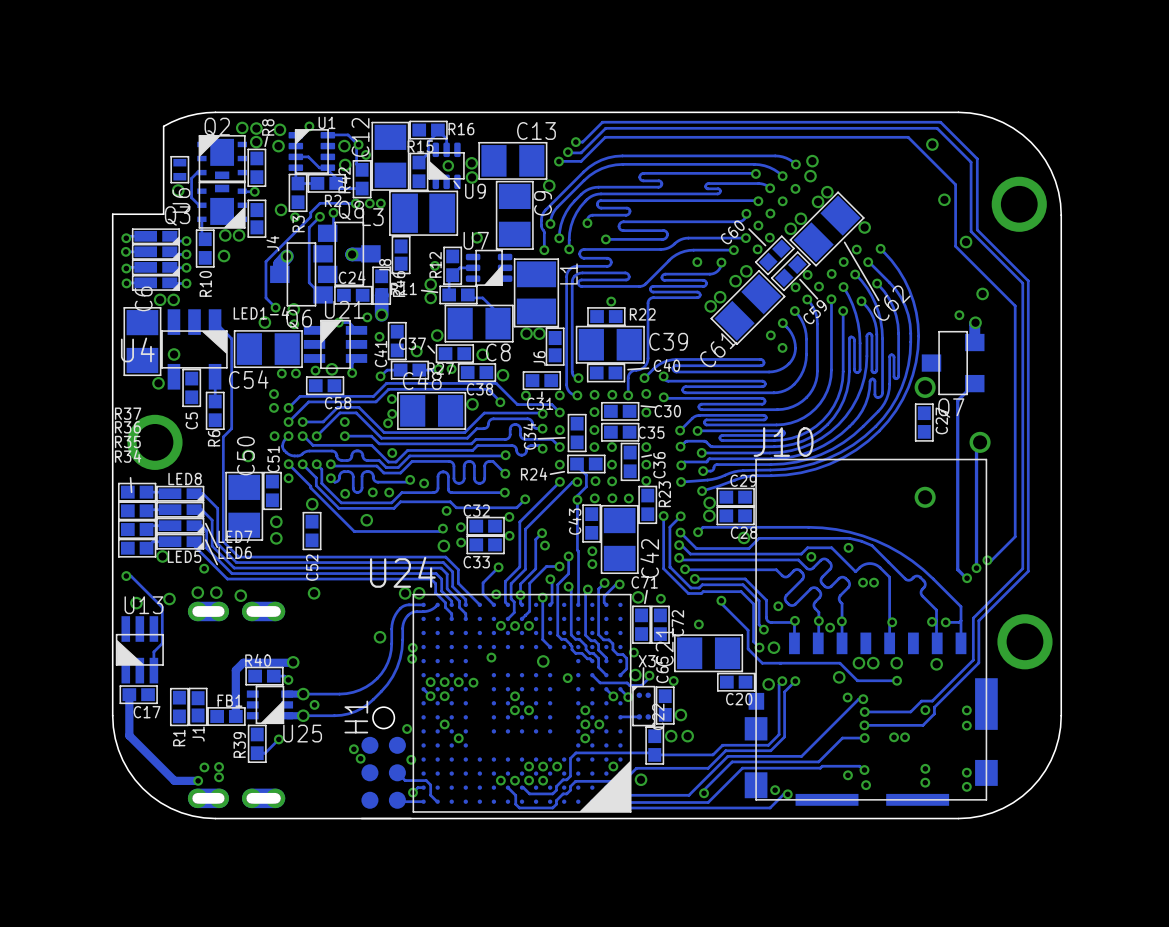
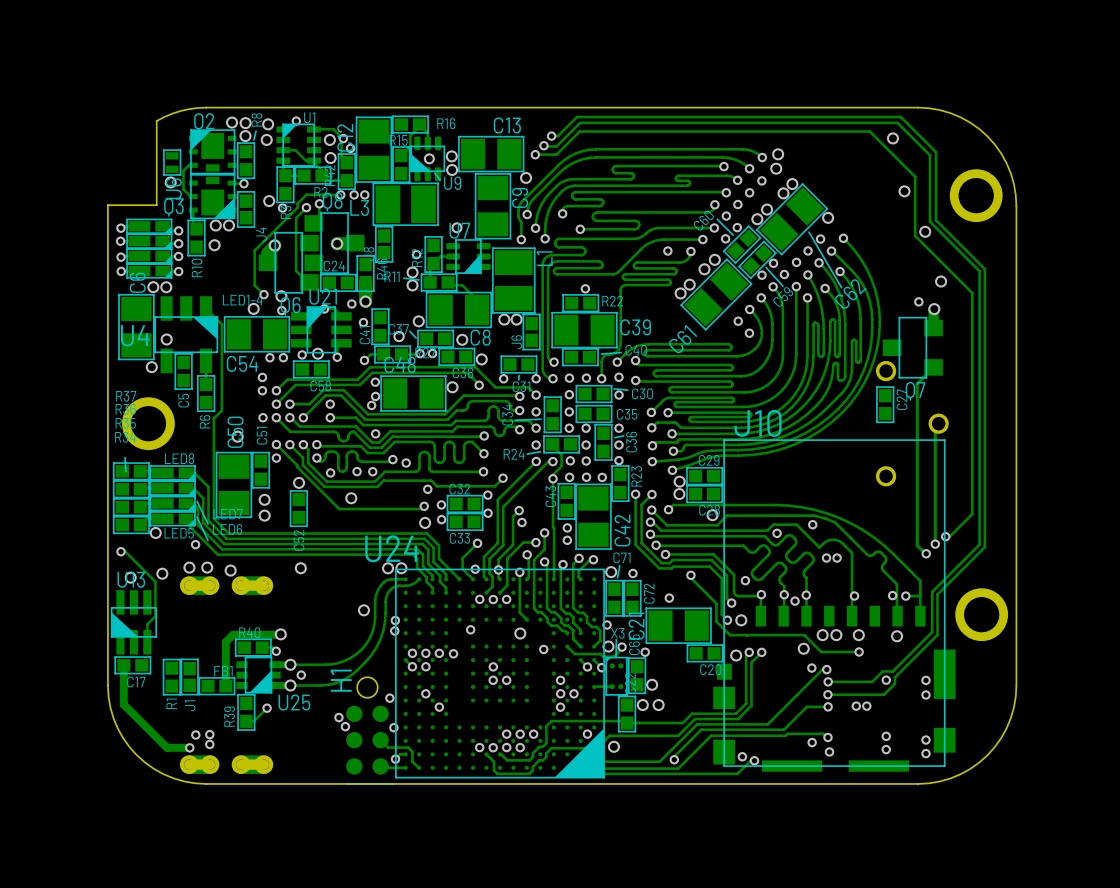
track: (288, 436) (283, 441) (282, 447) (290, 455) (299, 455) (308, 451) (332, 451) (341, 460) -> (276, 417) (290, 431) (334, 431) (343, 441) (346, 440) (349, 433) (353, 431) (363, 441)
track: (379, 460) (365, 460) (361, 452) (358, 450) (353, 452) (349, 459) (341, 460) -> none

